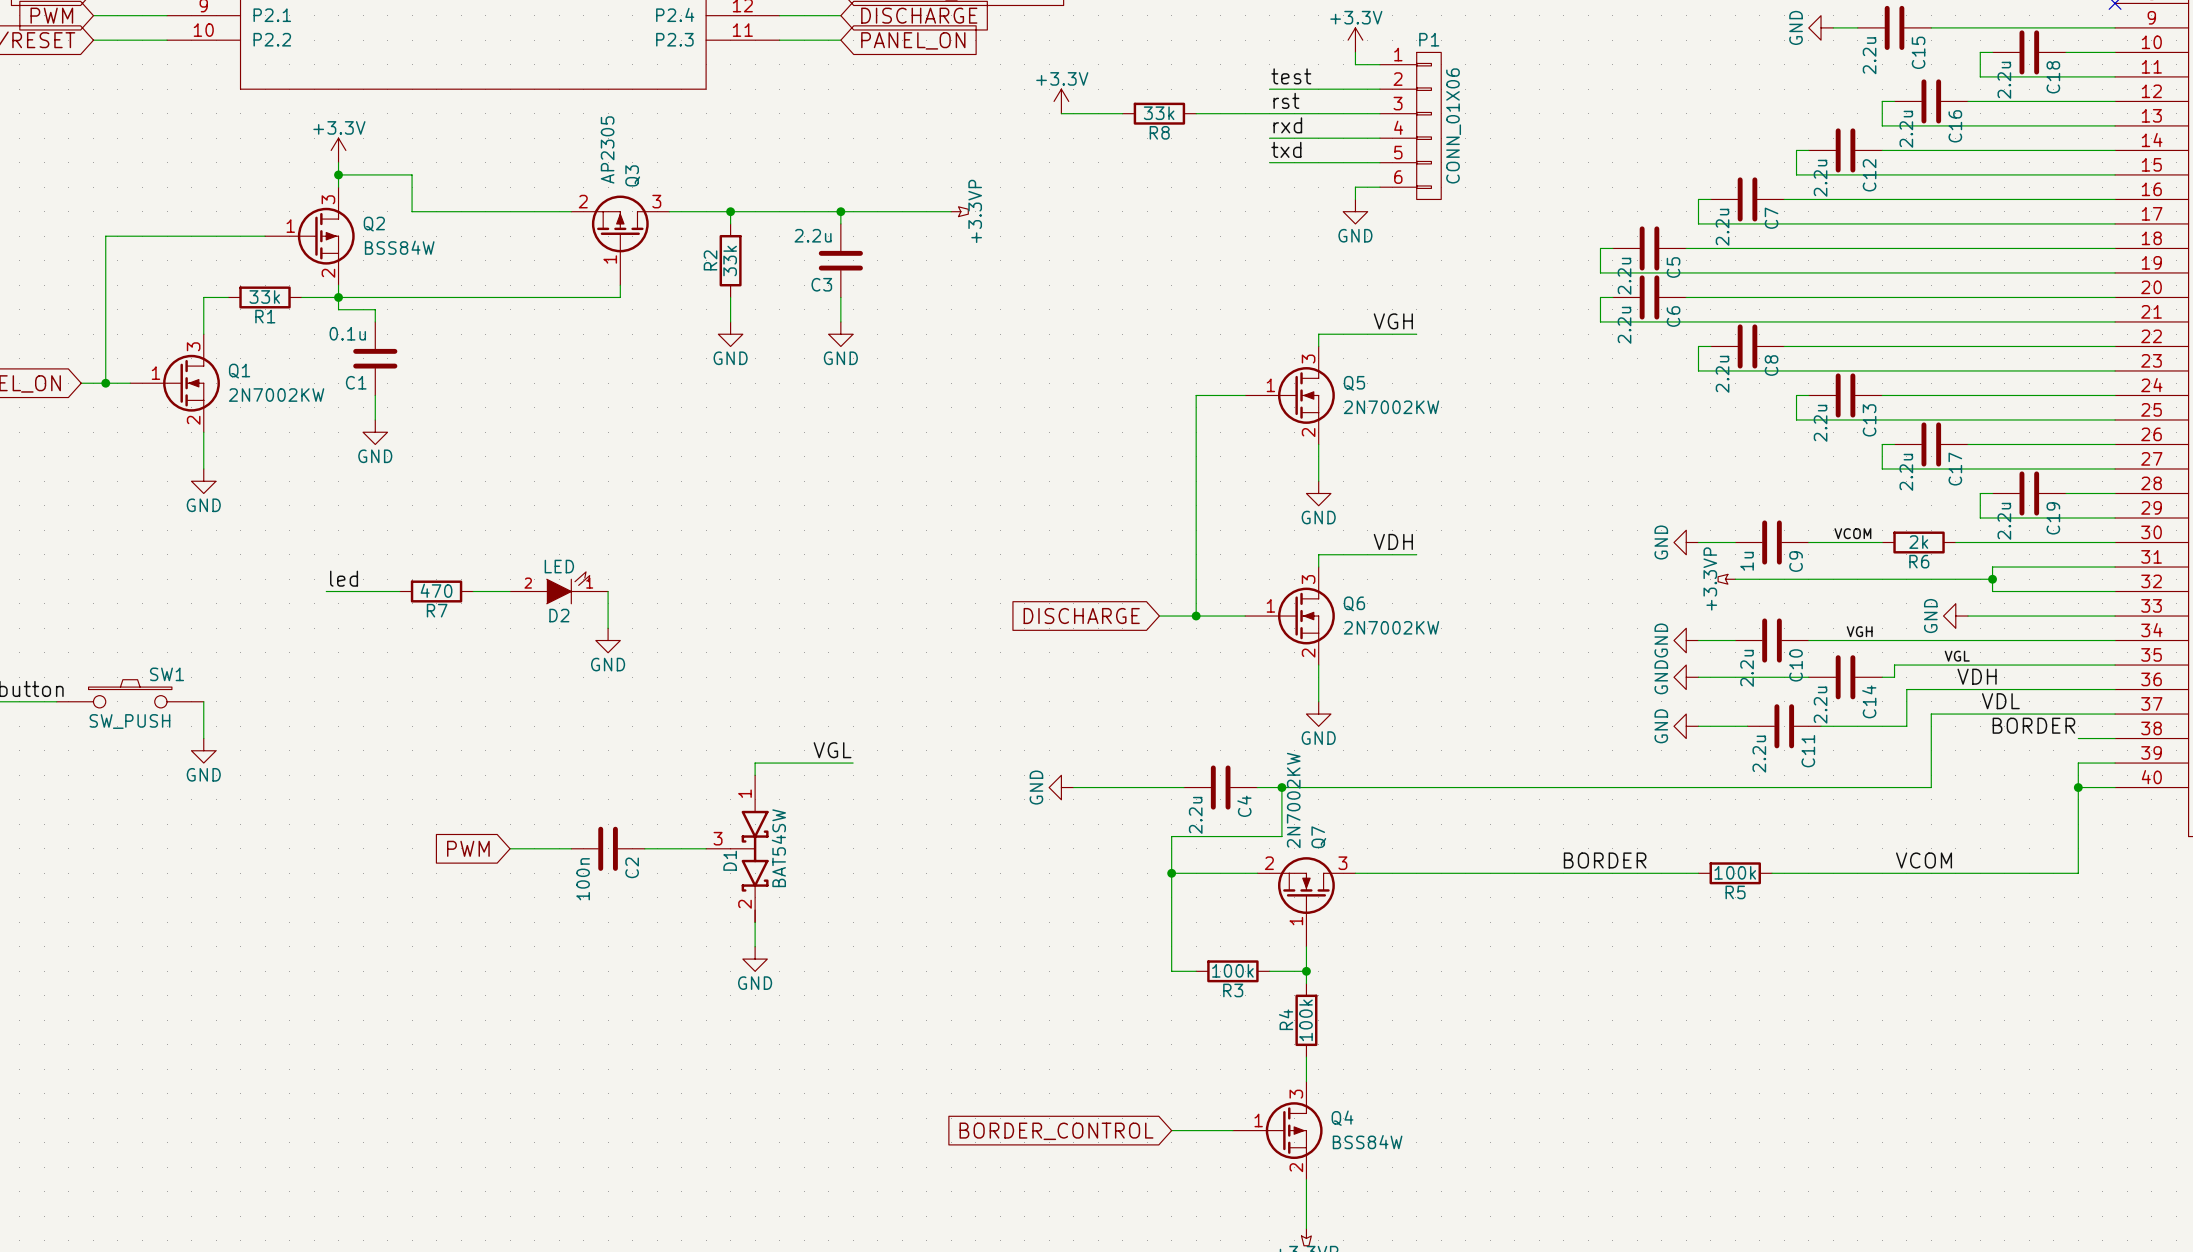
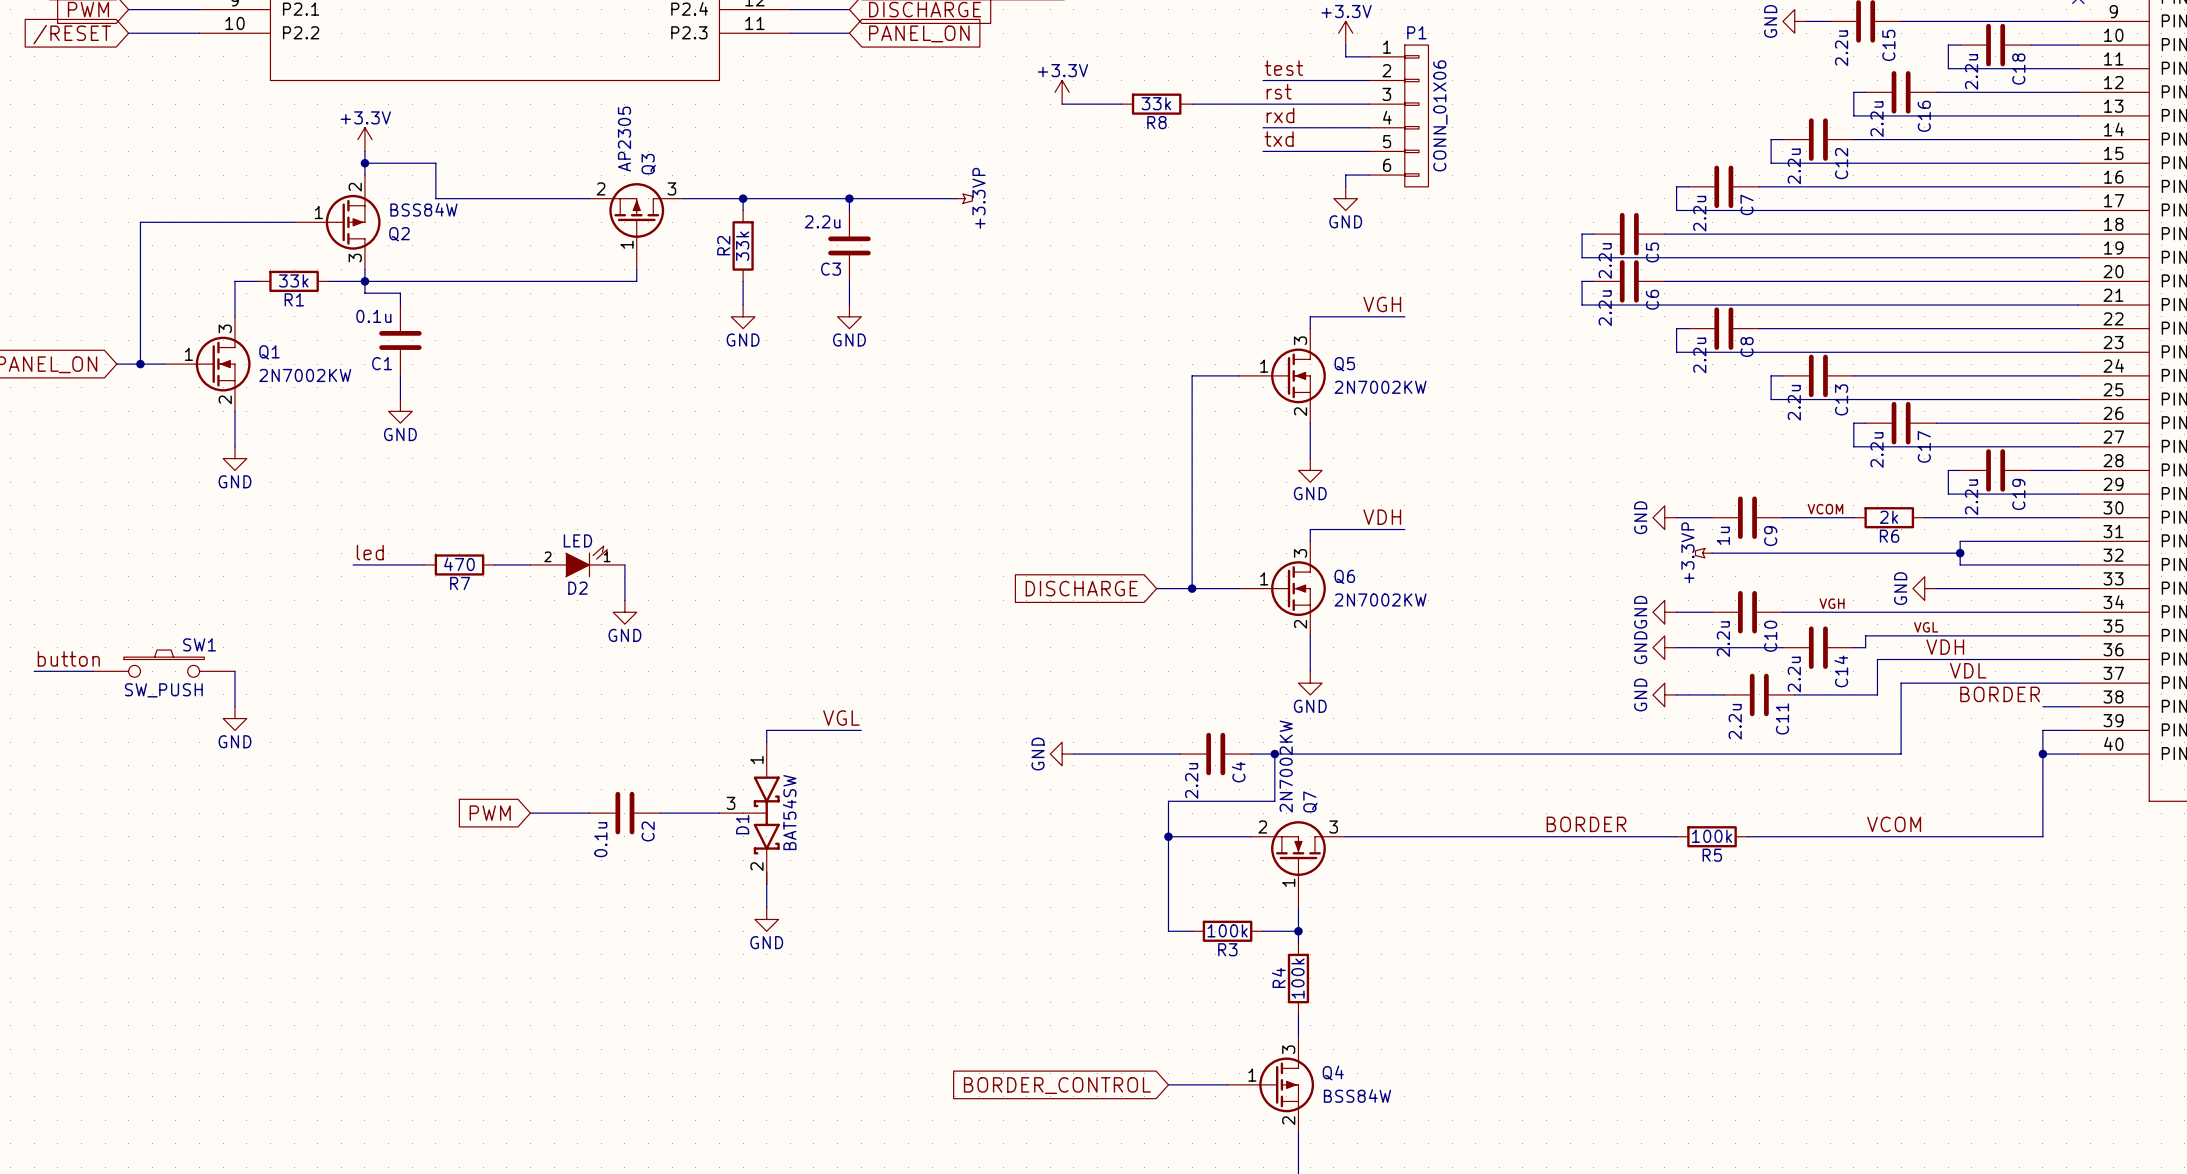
Q2 flip: as is (326, 236) -> up-down (353, 222)
C2 value: 100n (583, 879) -> 0.1u (600, 839)

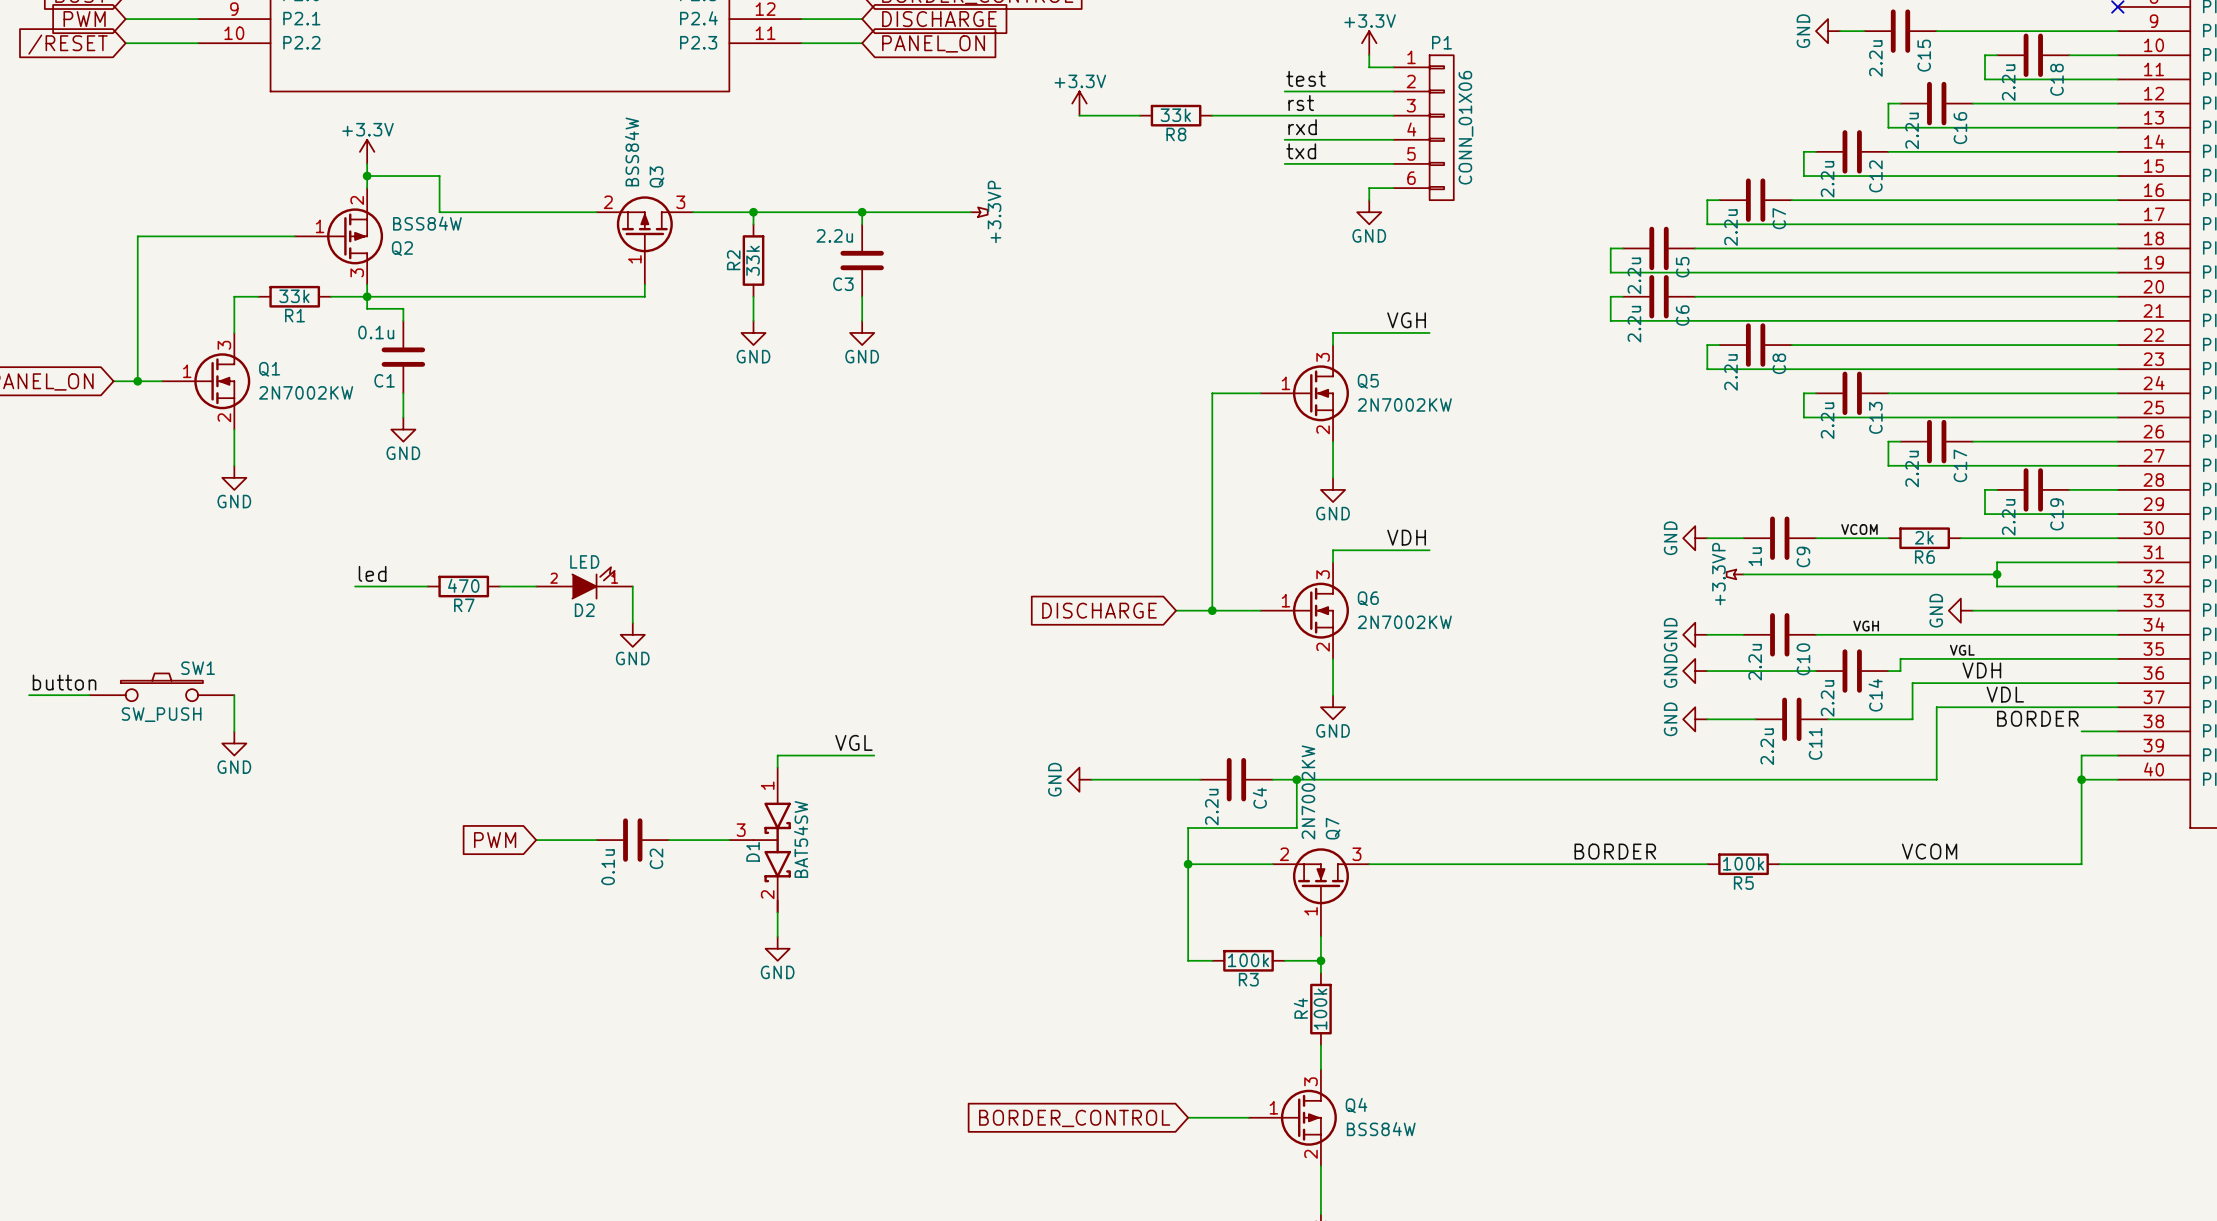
Q3 value: AP2305 (624, 139) -> BSS84W (632, 151)

